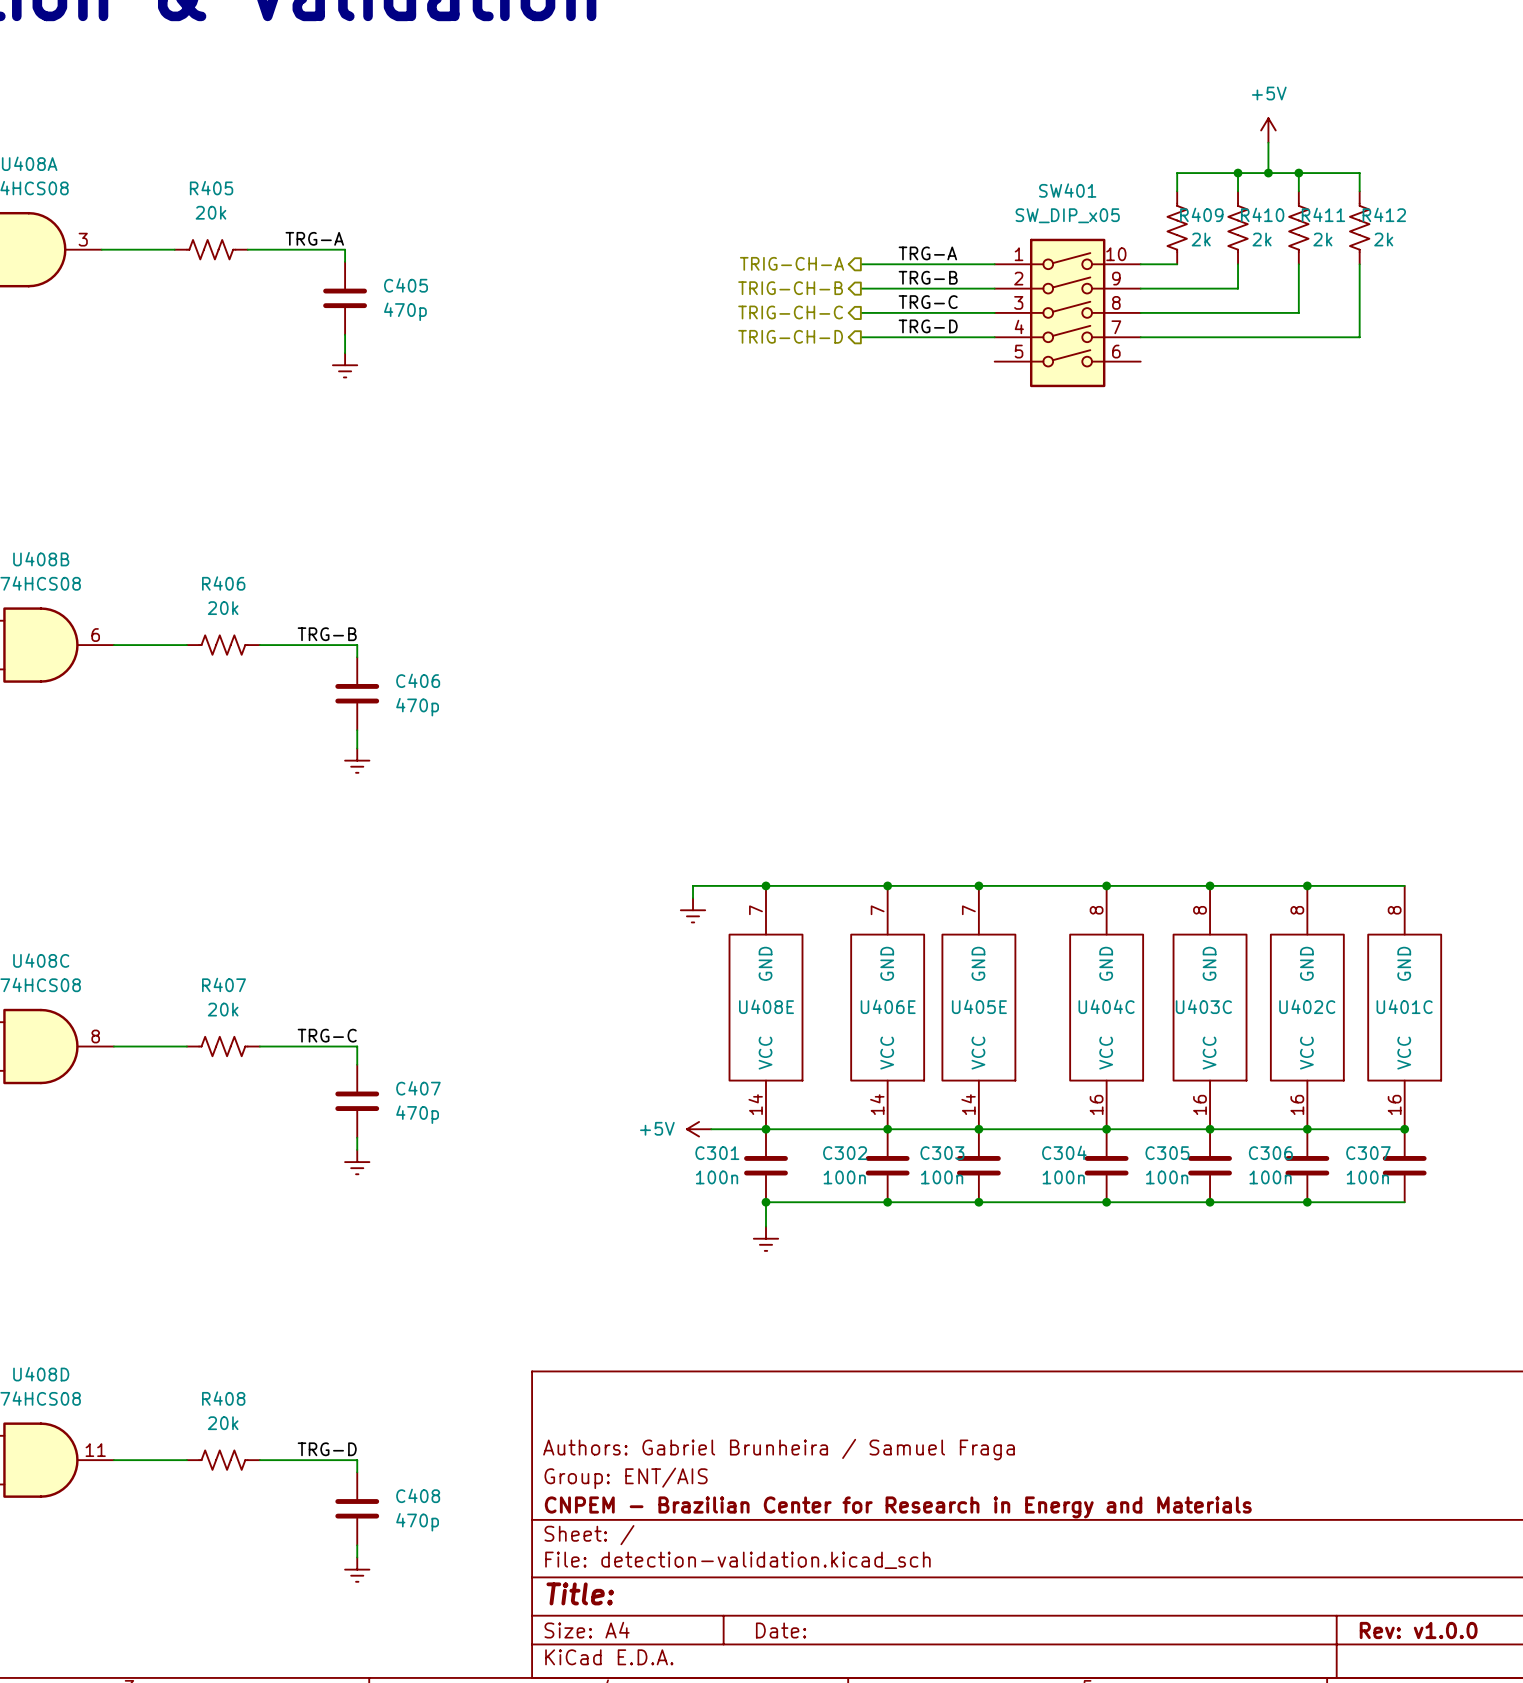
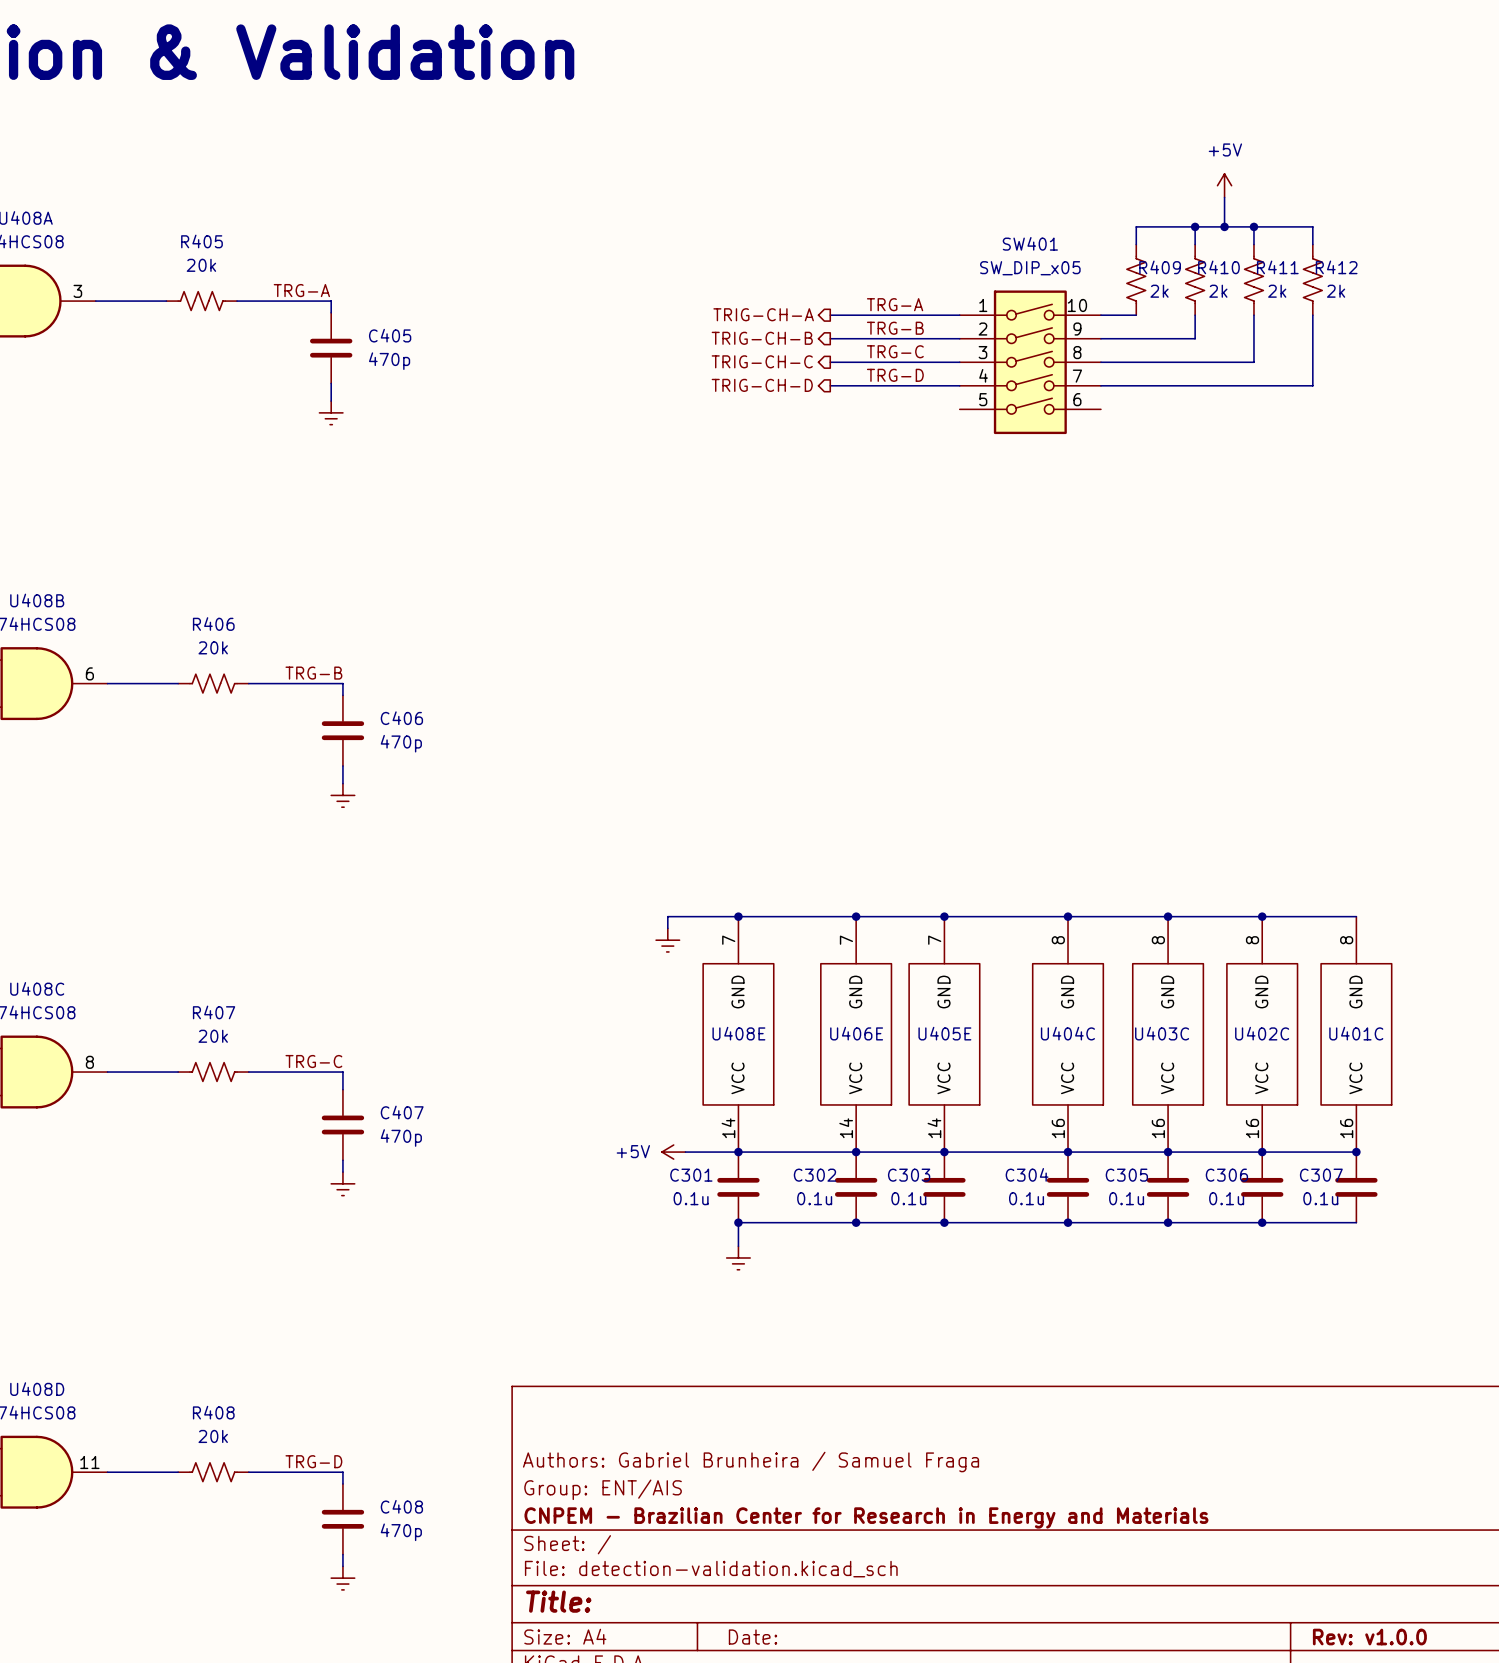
C301 value: 100n (717, 1177) -> 0.1u (691, 1198)
C302 value: 100n (844, 1177) -> 0.1u (814, 1198)
C303 value: 100n (942, 1177) -> 0.1u (908, 1198)
C304 value: 100n (1063, 1177) -> 0.1u (1026, 1198)
C305 value: 100n (1167, 1177) -> 0.1u (1126, 1198)
C306 value: 100n (1270, 1177) -> 0.1u (1226, 1198)
C307 value: 100n (1367, 1177) -> 0.1u (1320, 1198)

